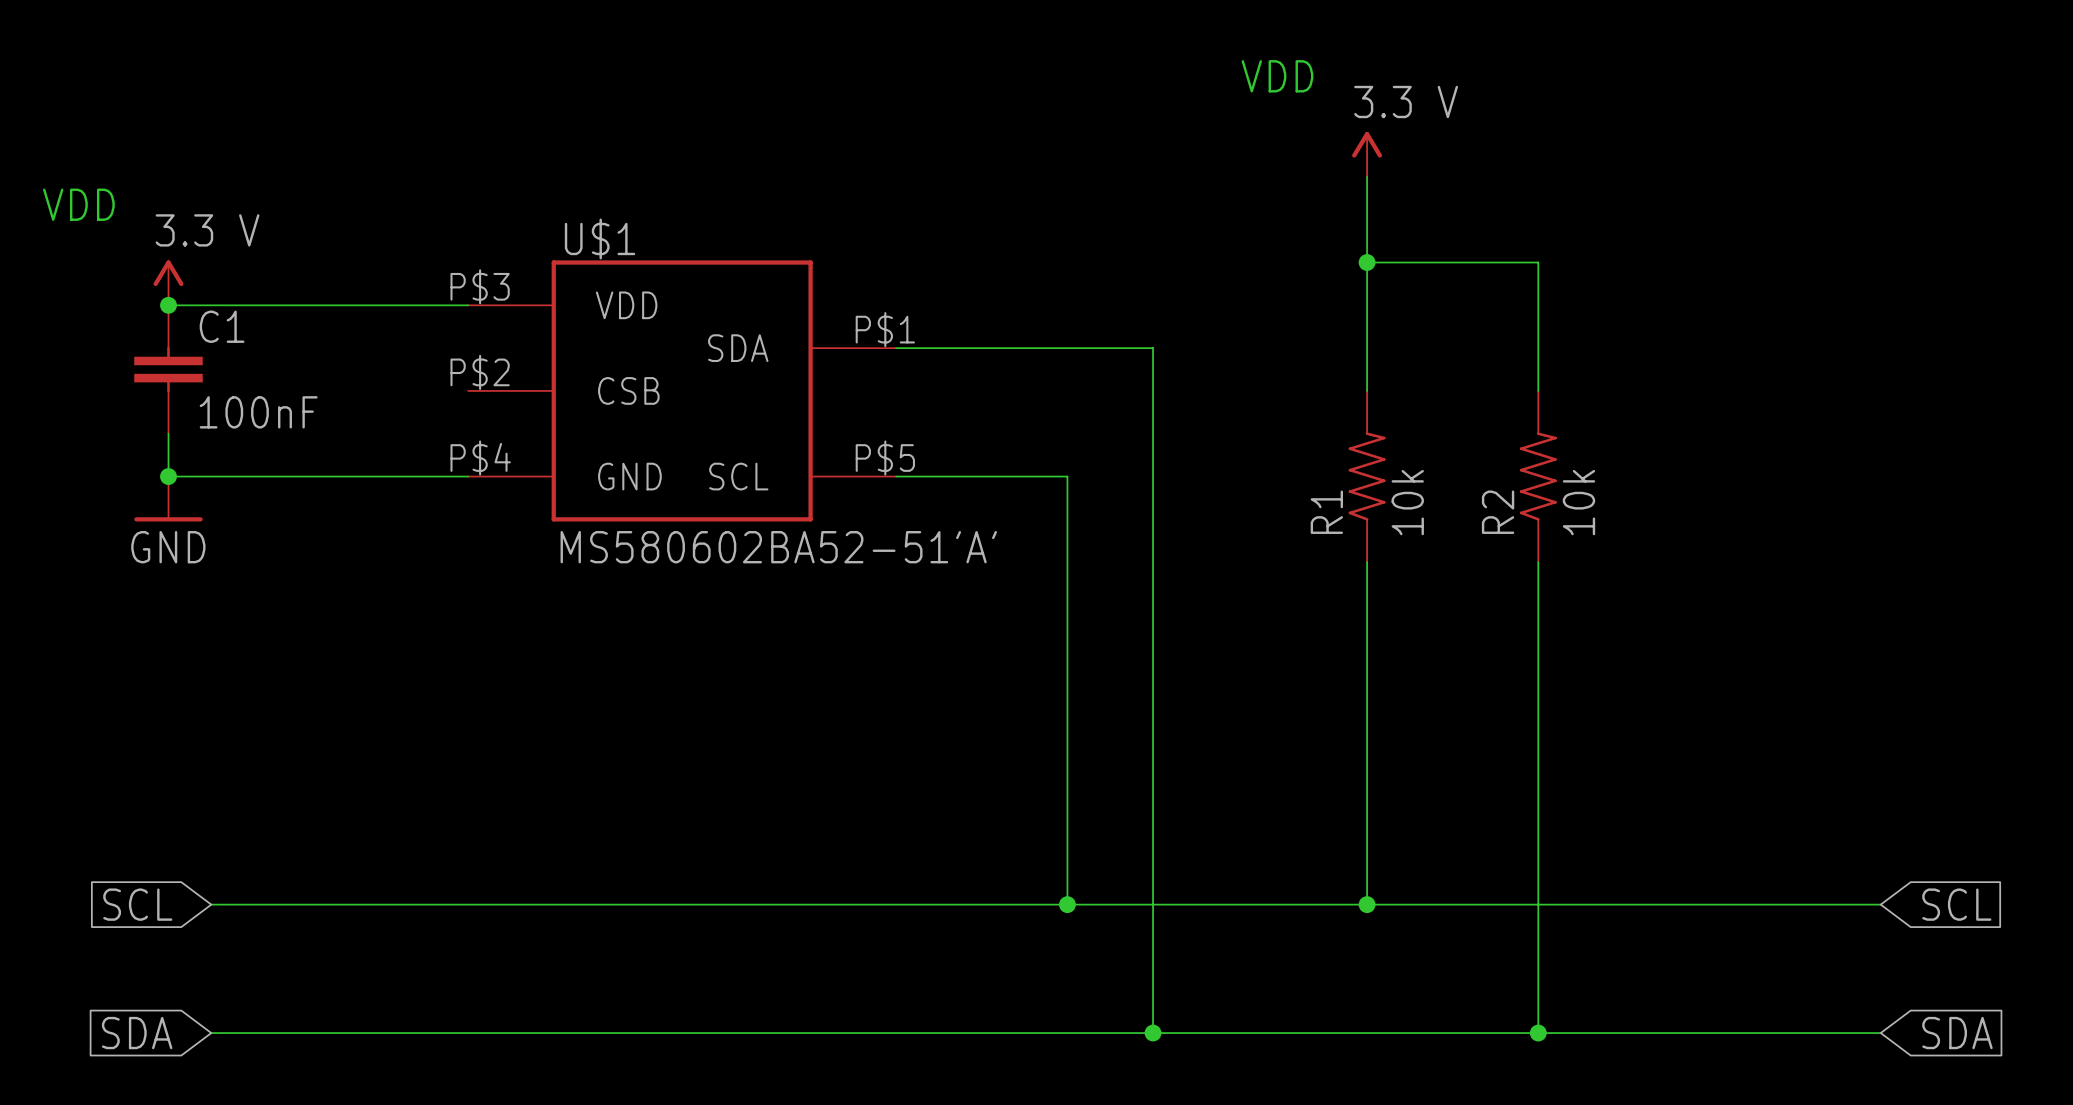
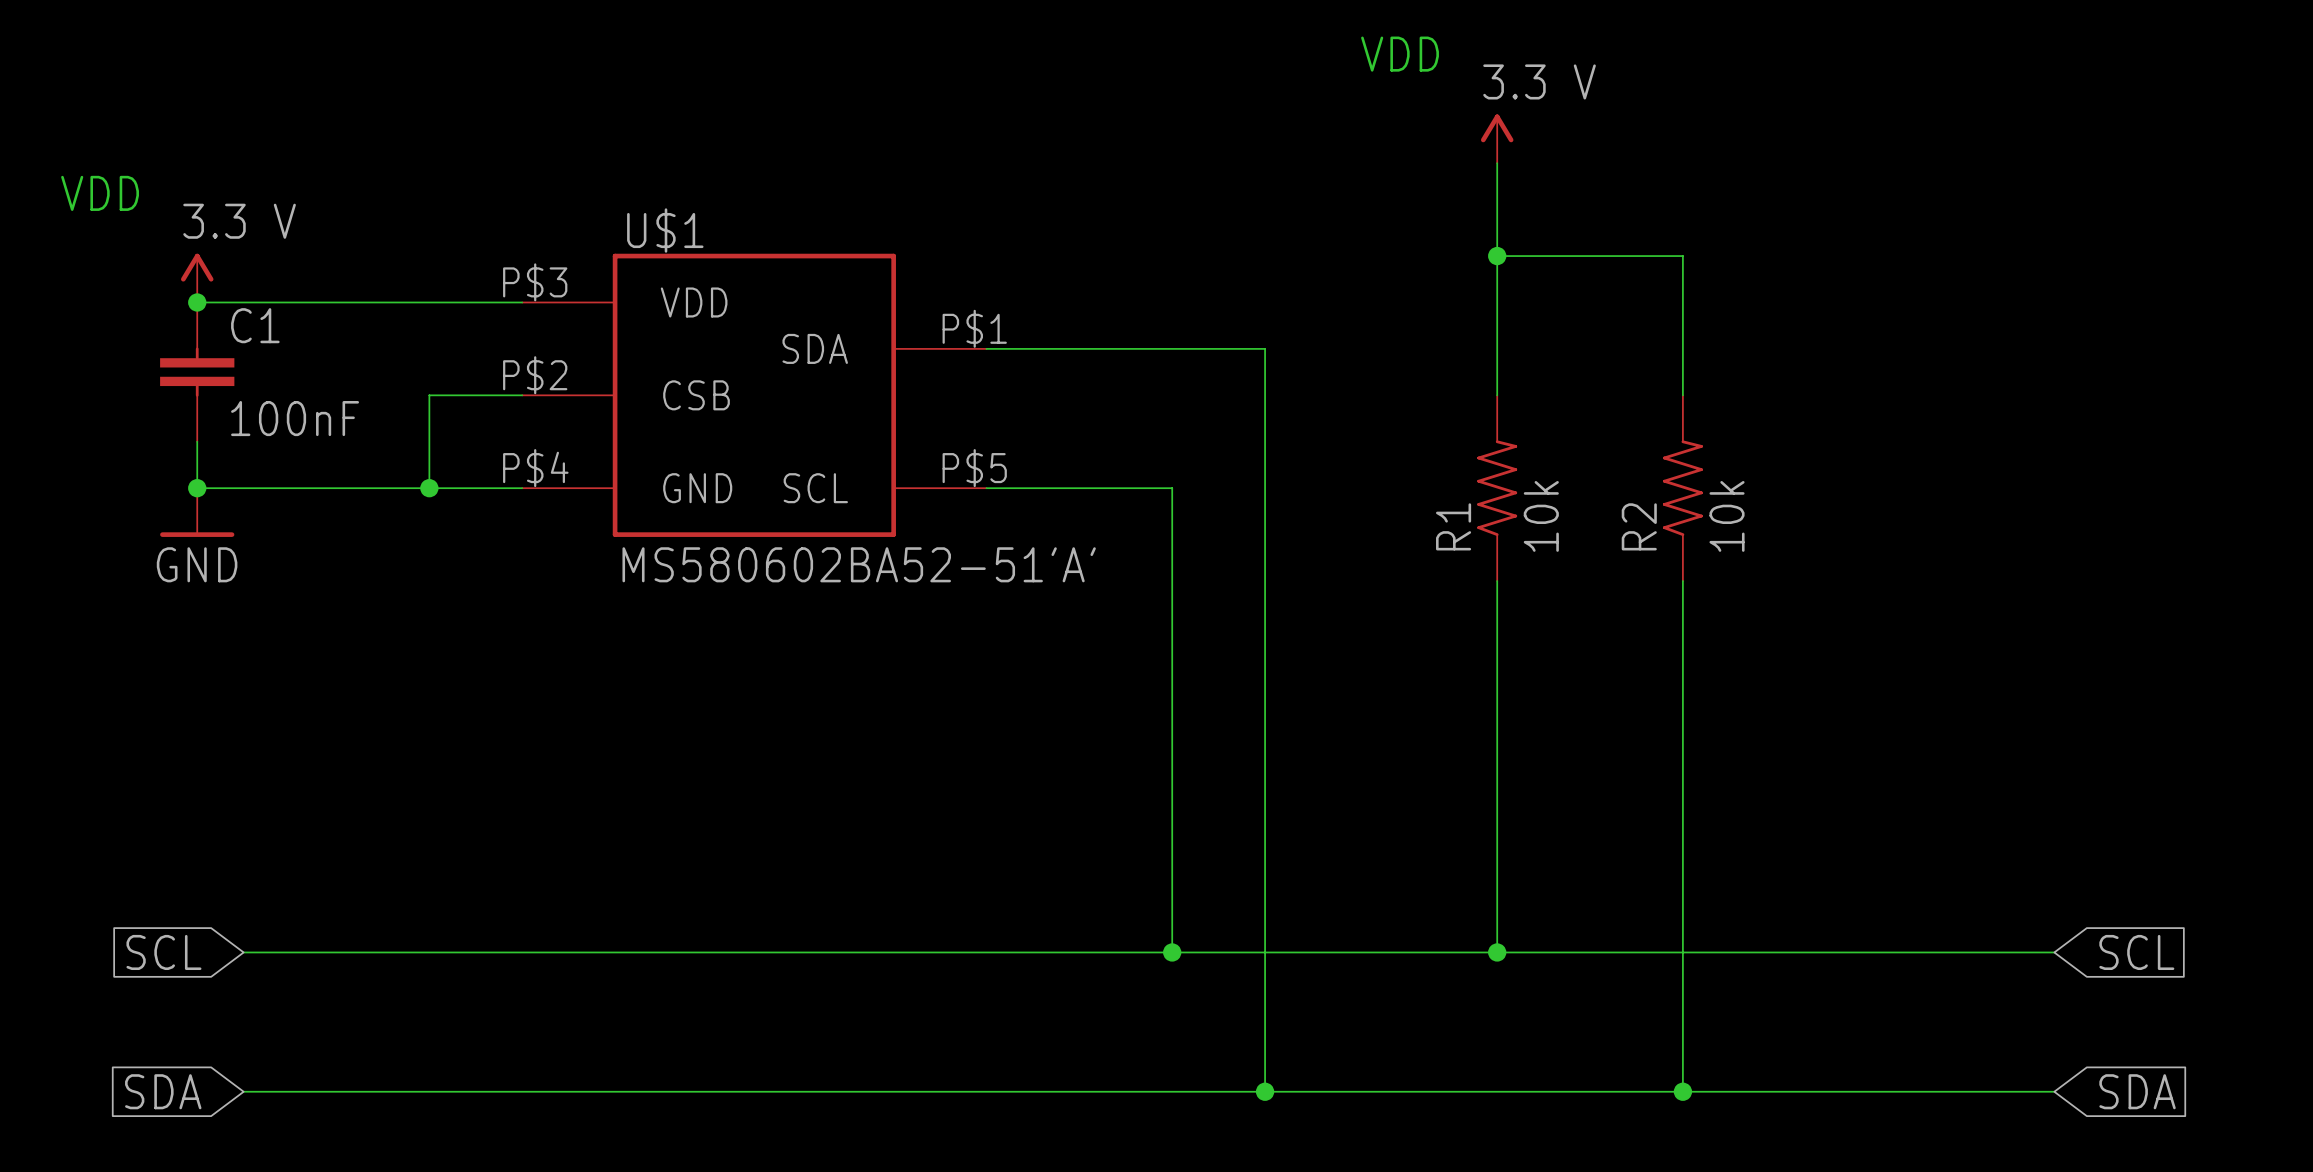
wire: none -> (522, 395) (429, 395) (429, 488)
junction: none -> (429, 488)

